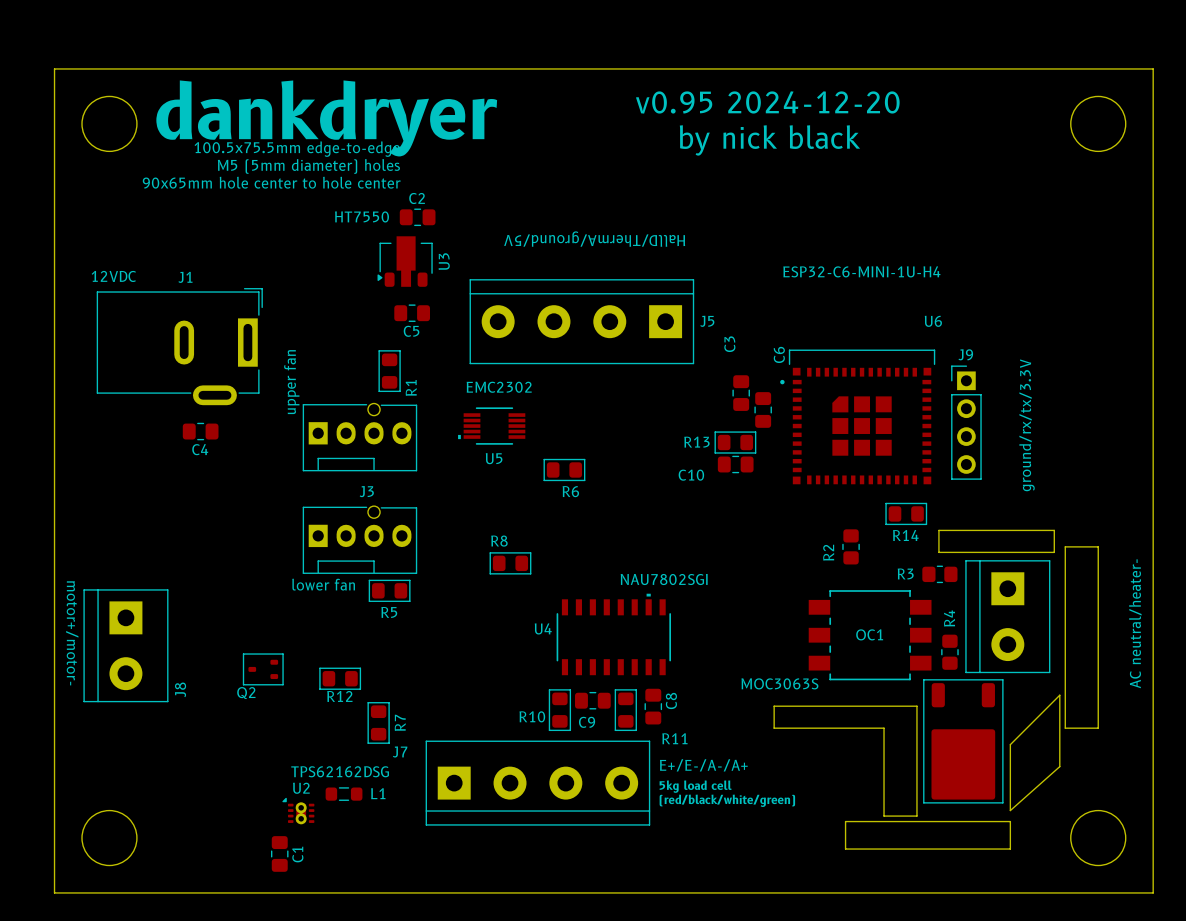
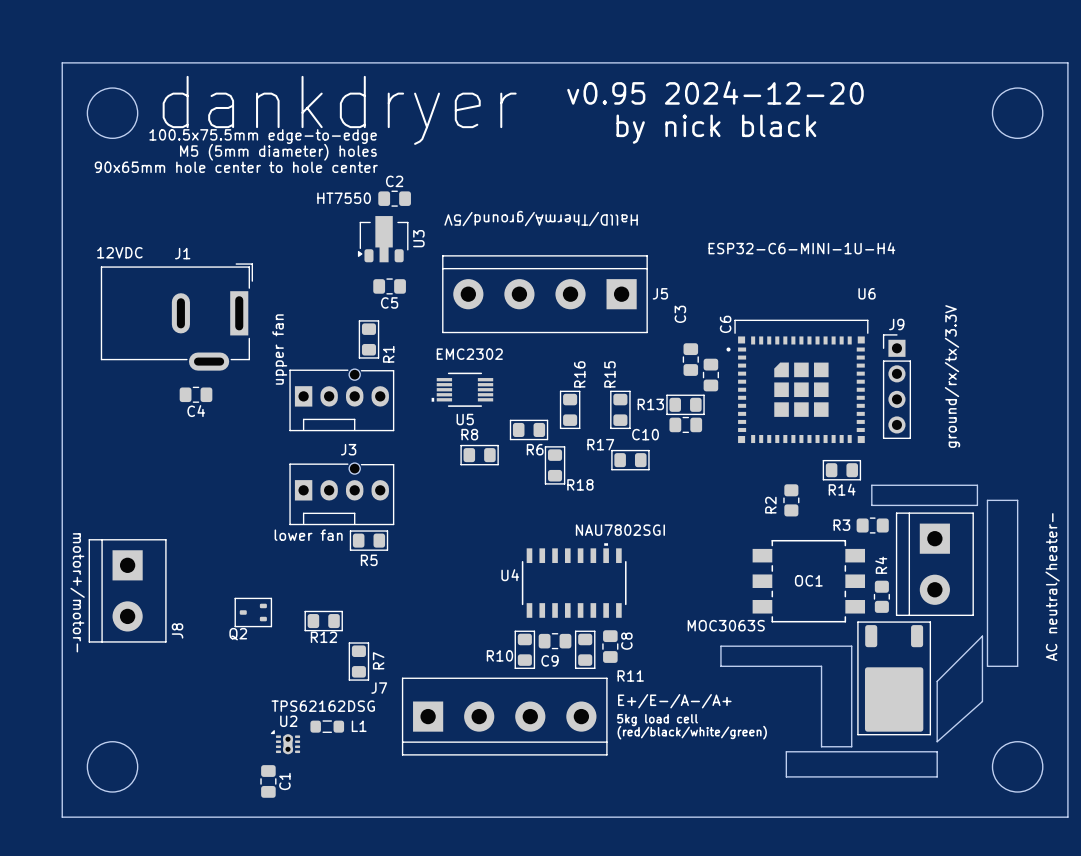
R16: none -> (570, 409)
R15: none -> (620, 409)
R17: none -> (630, 460)
R18: none -> (555, 465)
R8 position: (510, 563) -> (479, 455)

